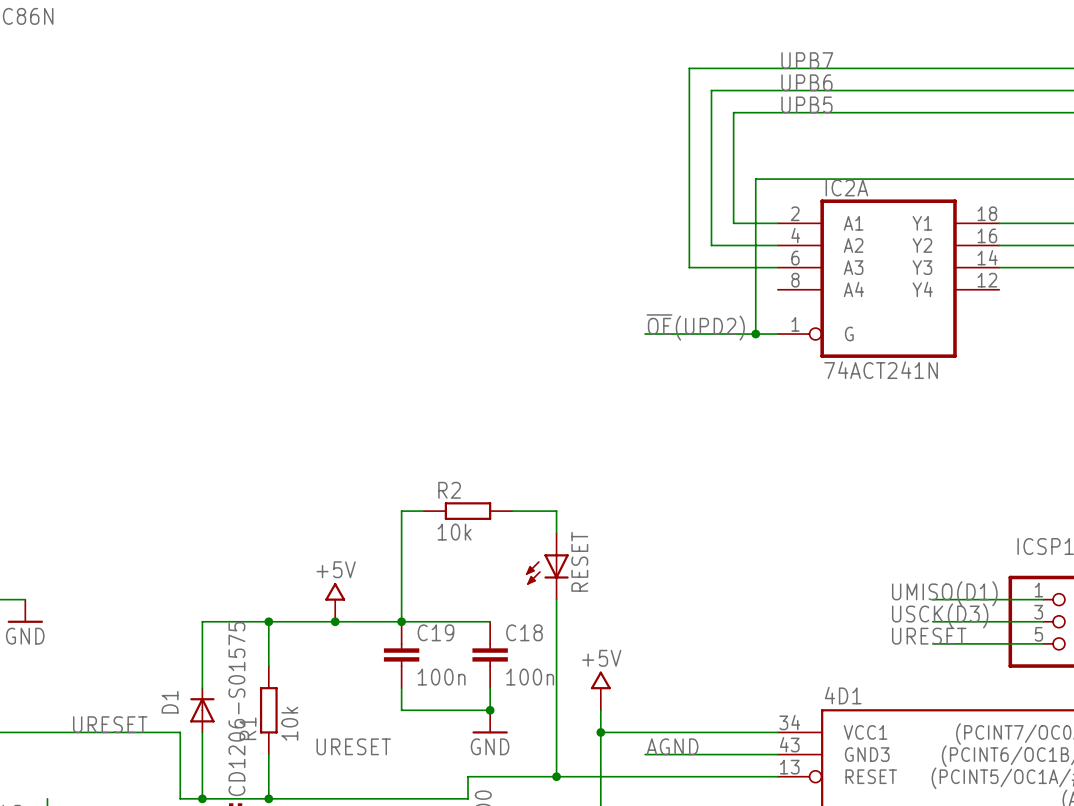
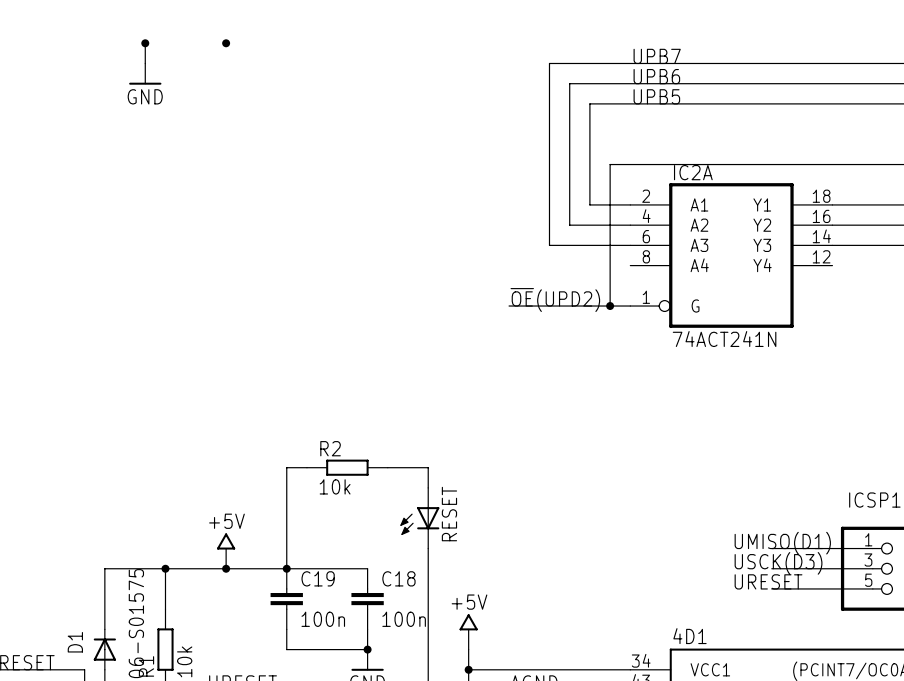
wire: none -> (145, 43) (145, 63)
junction: none -> (145, 43)
junction: none -> (226, 43)
power symbol: none -> GND (145, 74)

